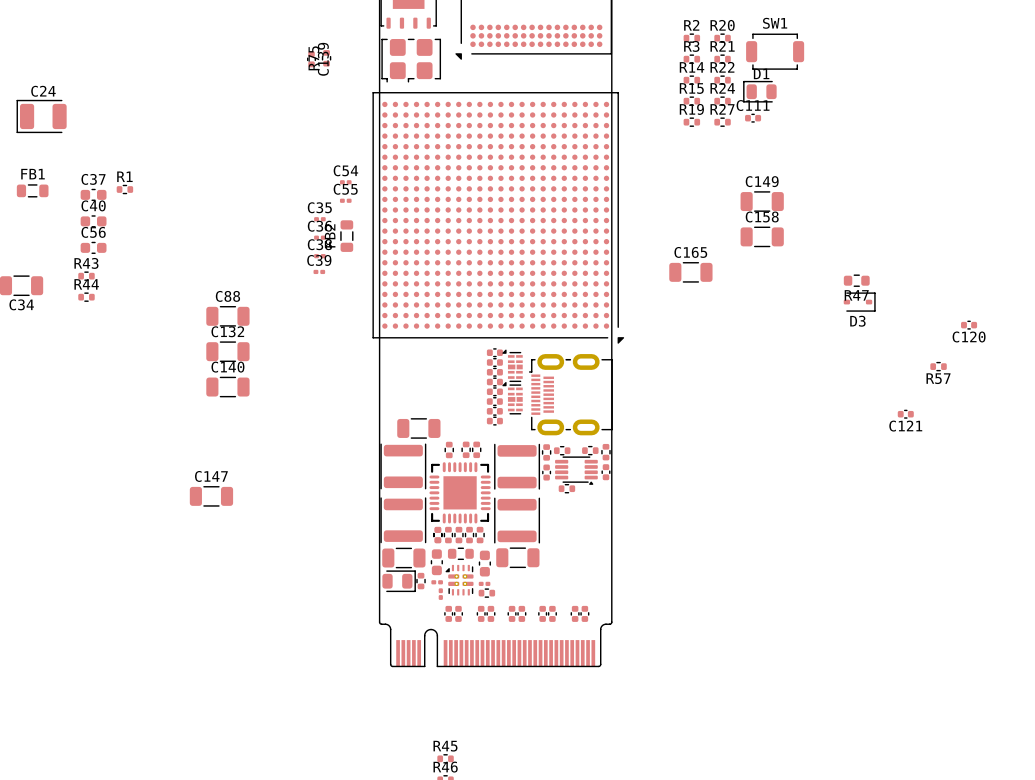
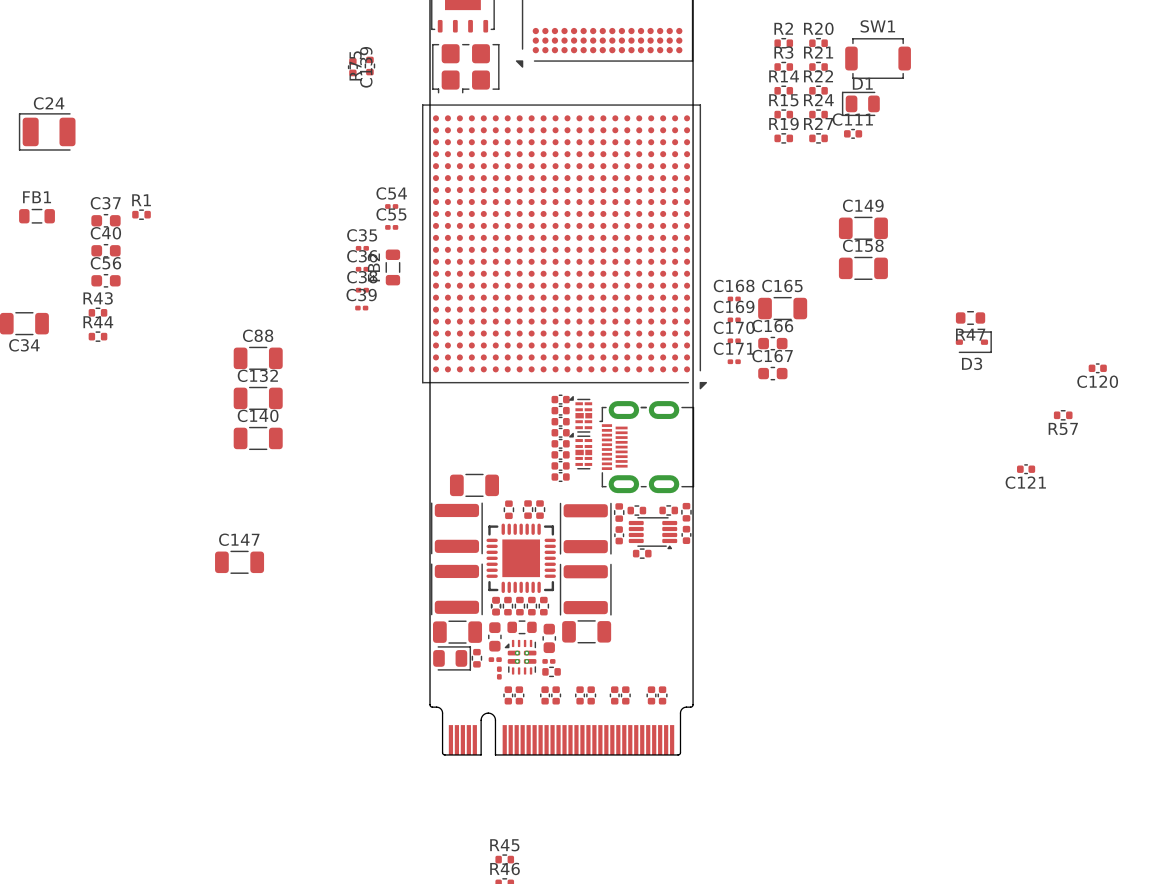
C168: none -> (734, 298)
C169: none -> (734, 319)
C170: none -> (734, 340)
C166: none -> (772, 343)
C171: none -> (734, 361)
C167: none -> (772, 373)

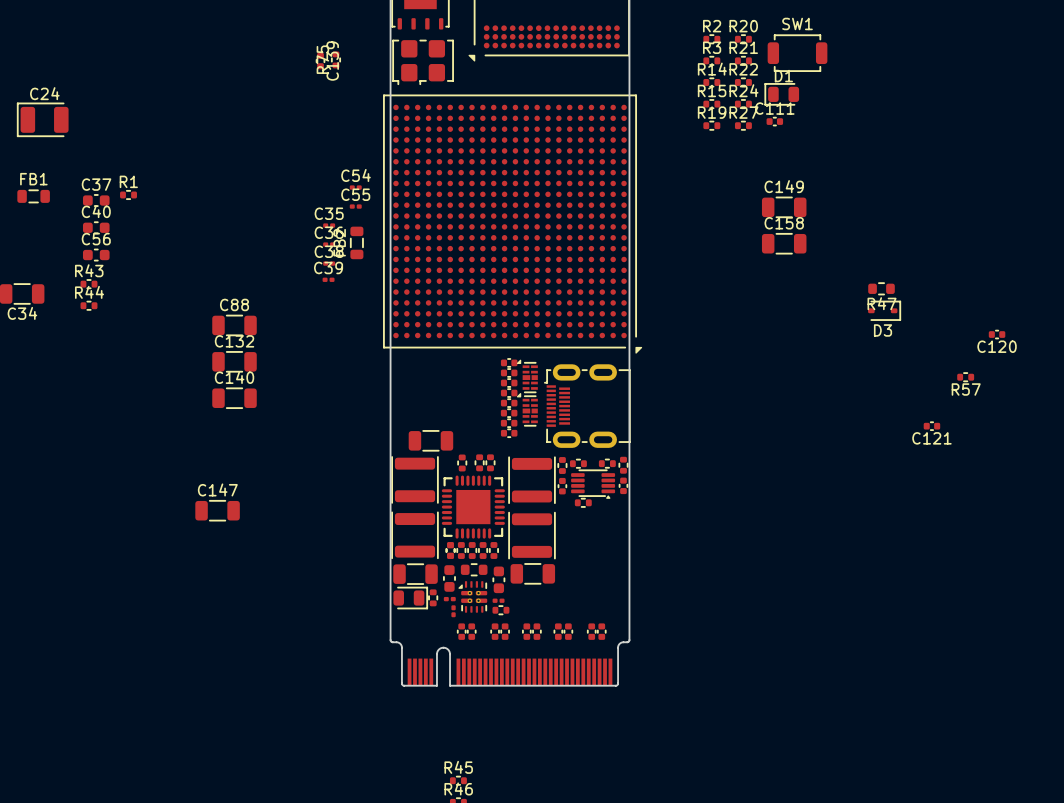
C168: (734, 298) -> none
C165: (782, 308) -> none
C169: (734, 319) -> none
C170: (734, 340) -> none
C166: (772, 343) -> none
C171: (734, 361) -> none
C167: (772, 373) -> none

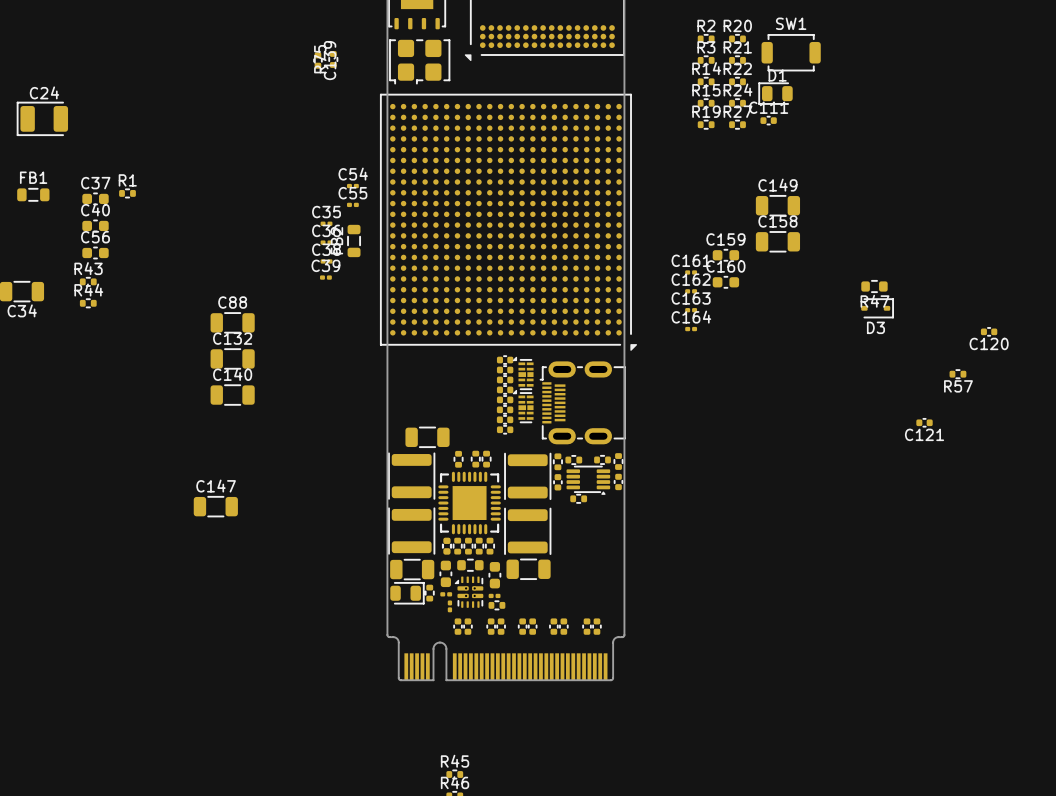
C159: none -> (725, 255)
C161: none -> (691, 272)
C160: none -> (725, 282)
C162: none -> (691, 291)
C163: none -> (691, 310)
C164: none -> (691, 329)

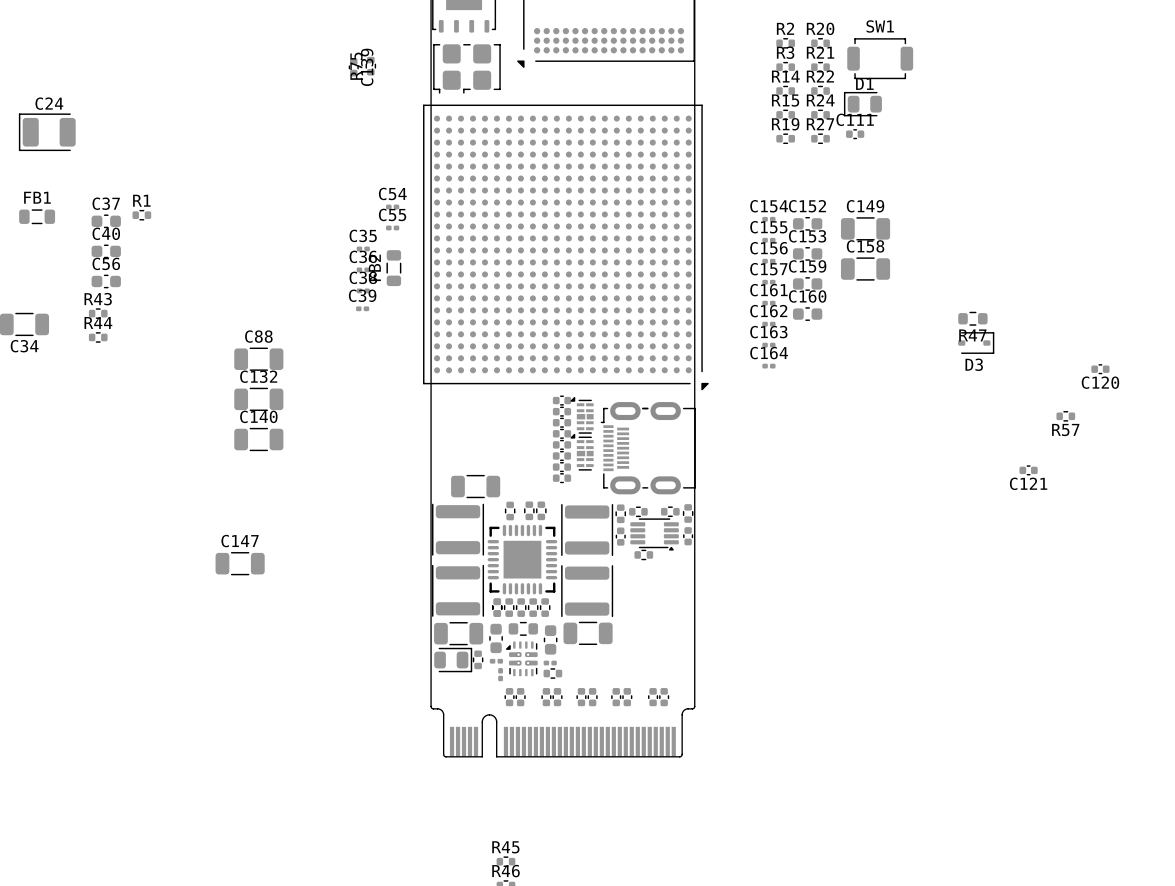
C154: none -> (768, 219)
C152: none -> (807, 223)
C155: none -> (768, 240)
C153: none -> (807, 253)
C156: none -> (768, 261)
C157: none -> (768, 282)

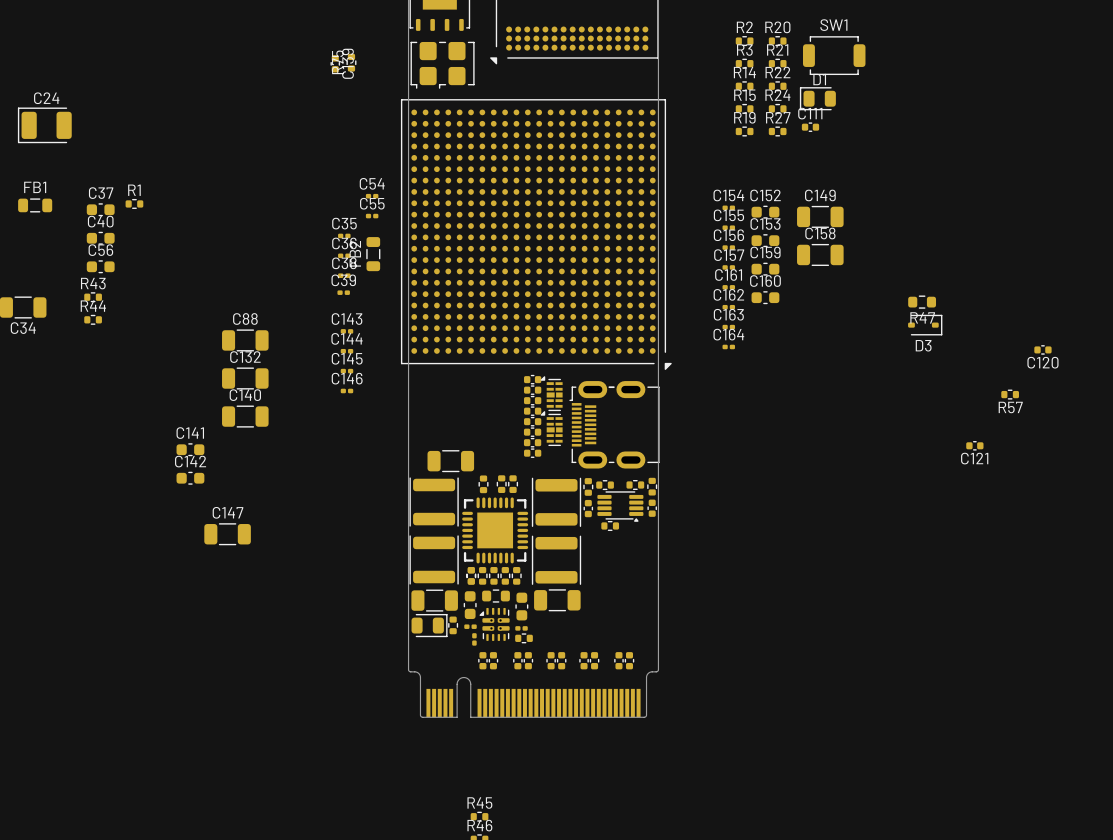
C143: none -> (346, 331)
C144: none -> (346, 351)
C145: none -> (346, 371)
C146: none -> (346, 390)
C141: none -> (190, 449)
C142: none -> (190, 478)

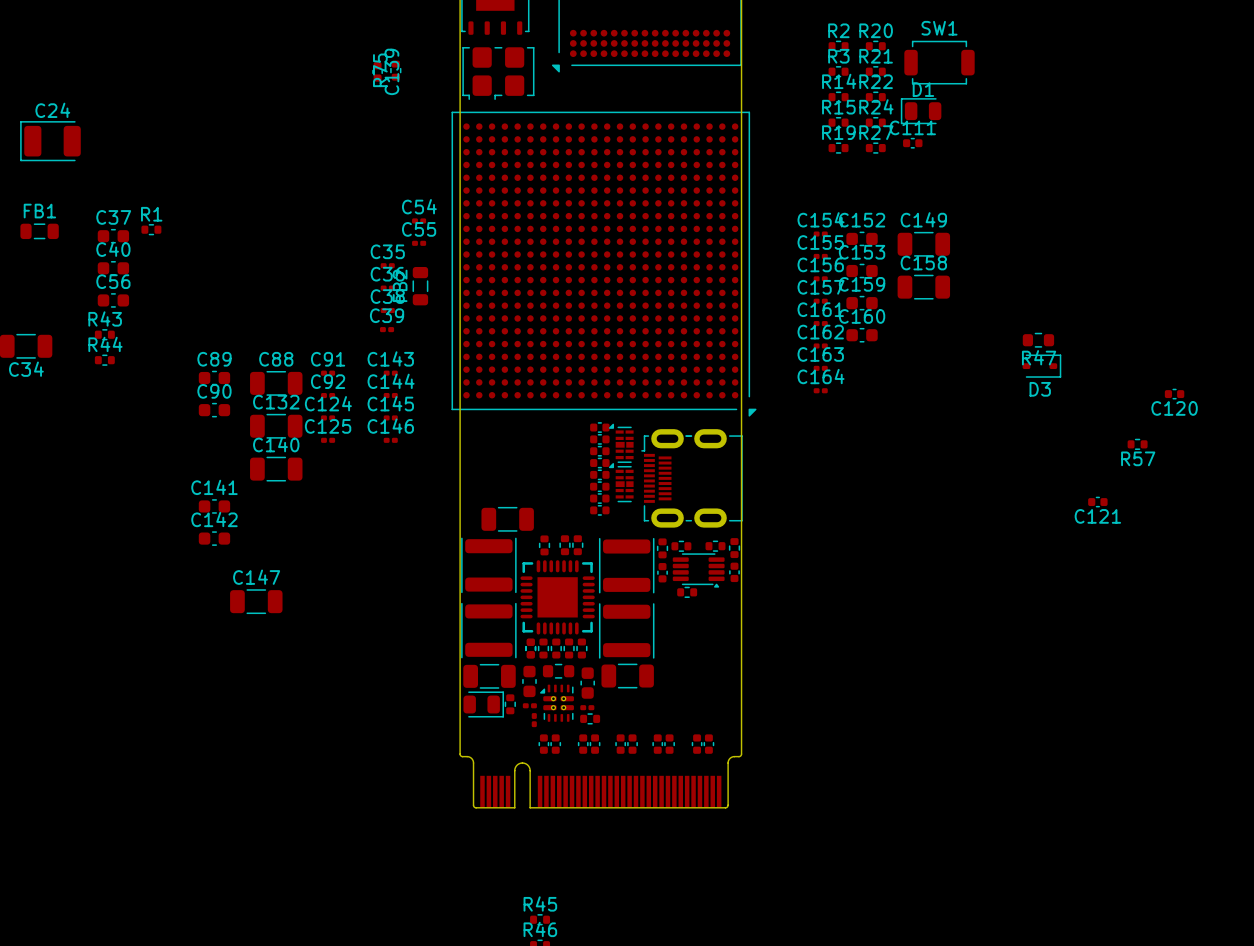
C91: none -> (328, 373)
C89: none -> (214, 378)
C92: none -> (328, 395)
C90: none -> (214, 410)
C124: none -> (328, 417)
C125: none -> (328, 440)

